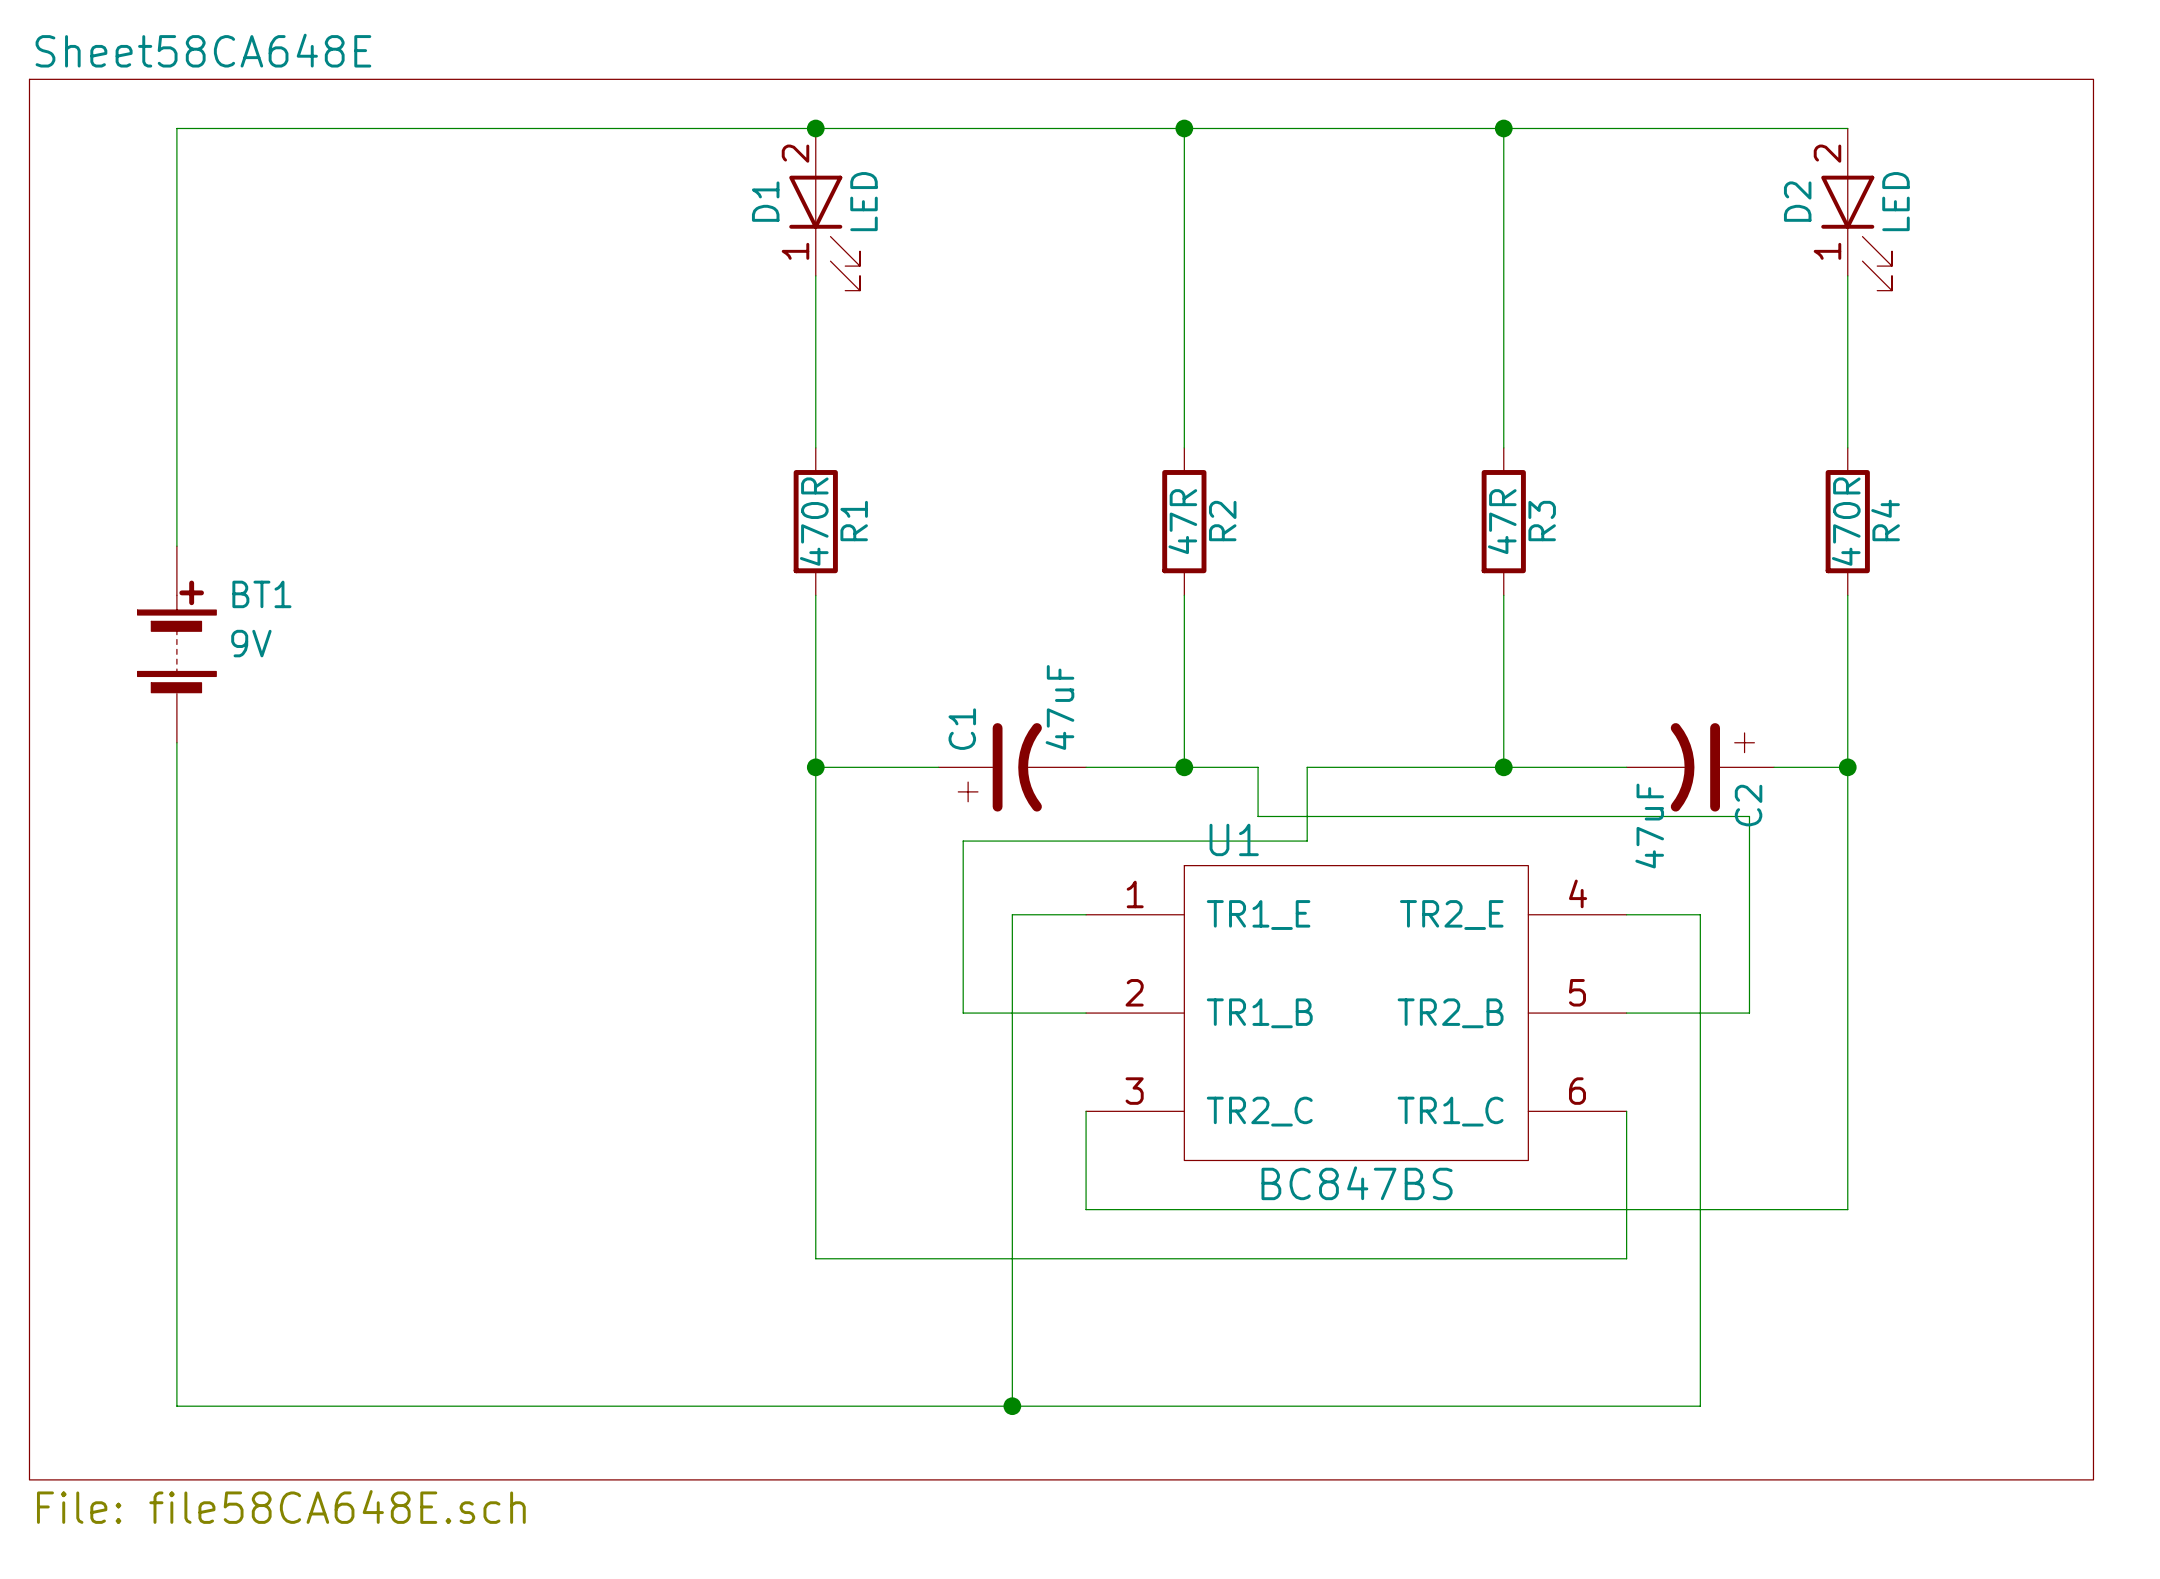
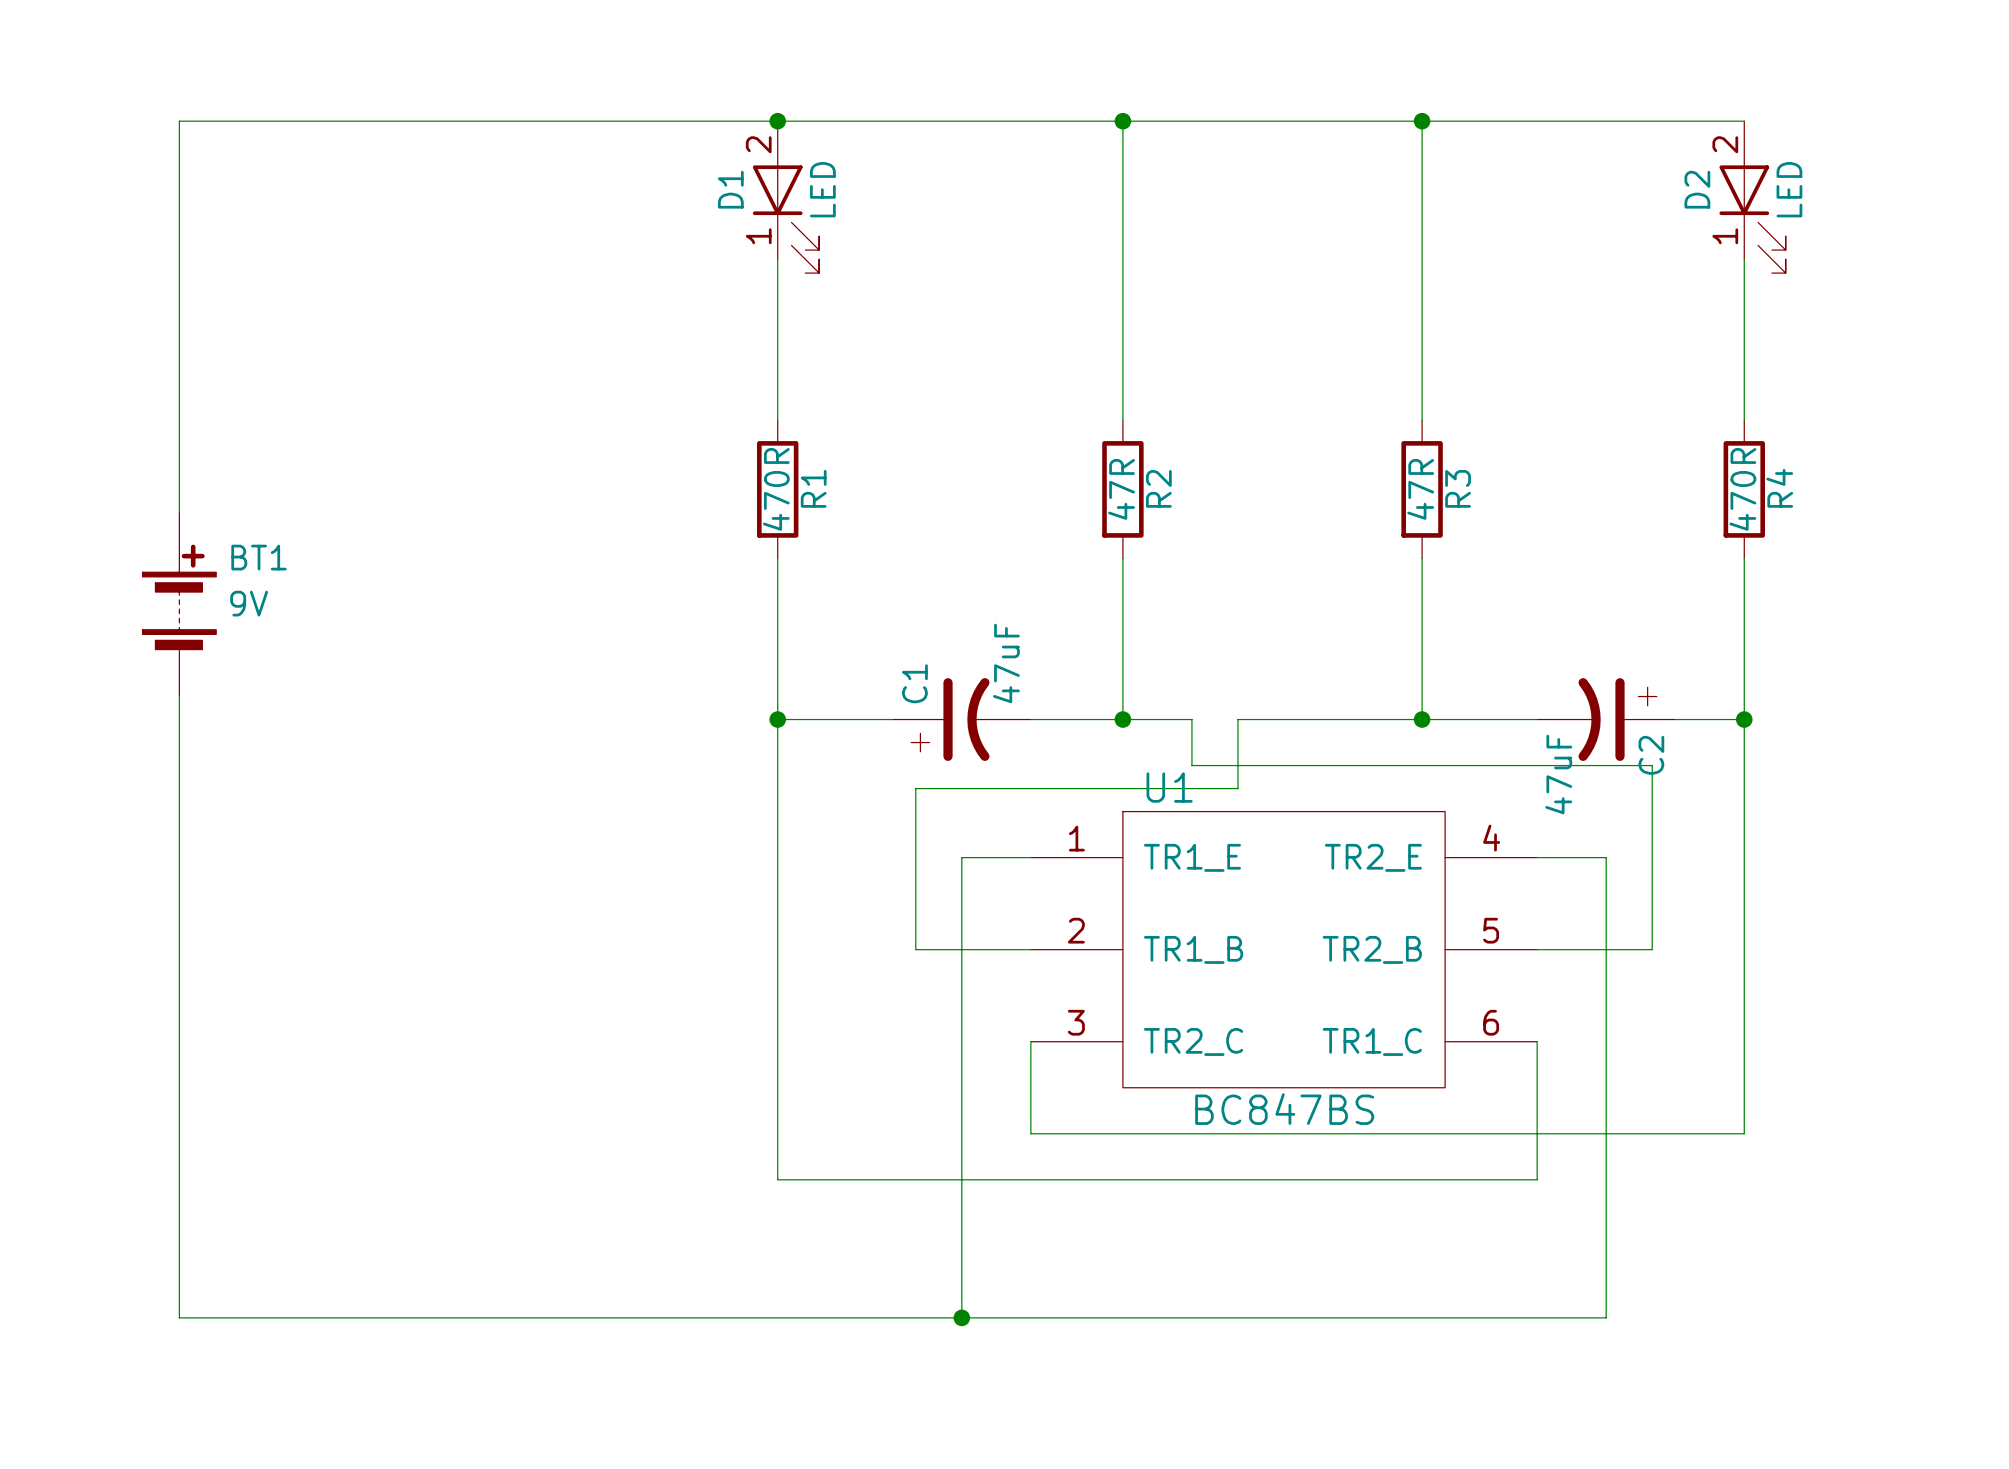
sheet Sheet58CA648E: File: file58CA648E.sch (1061, 779) -> none

